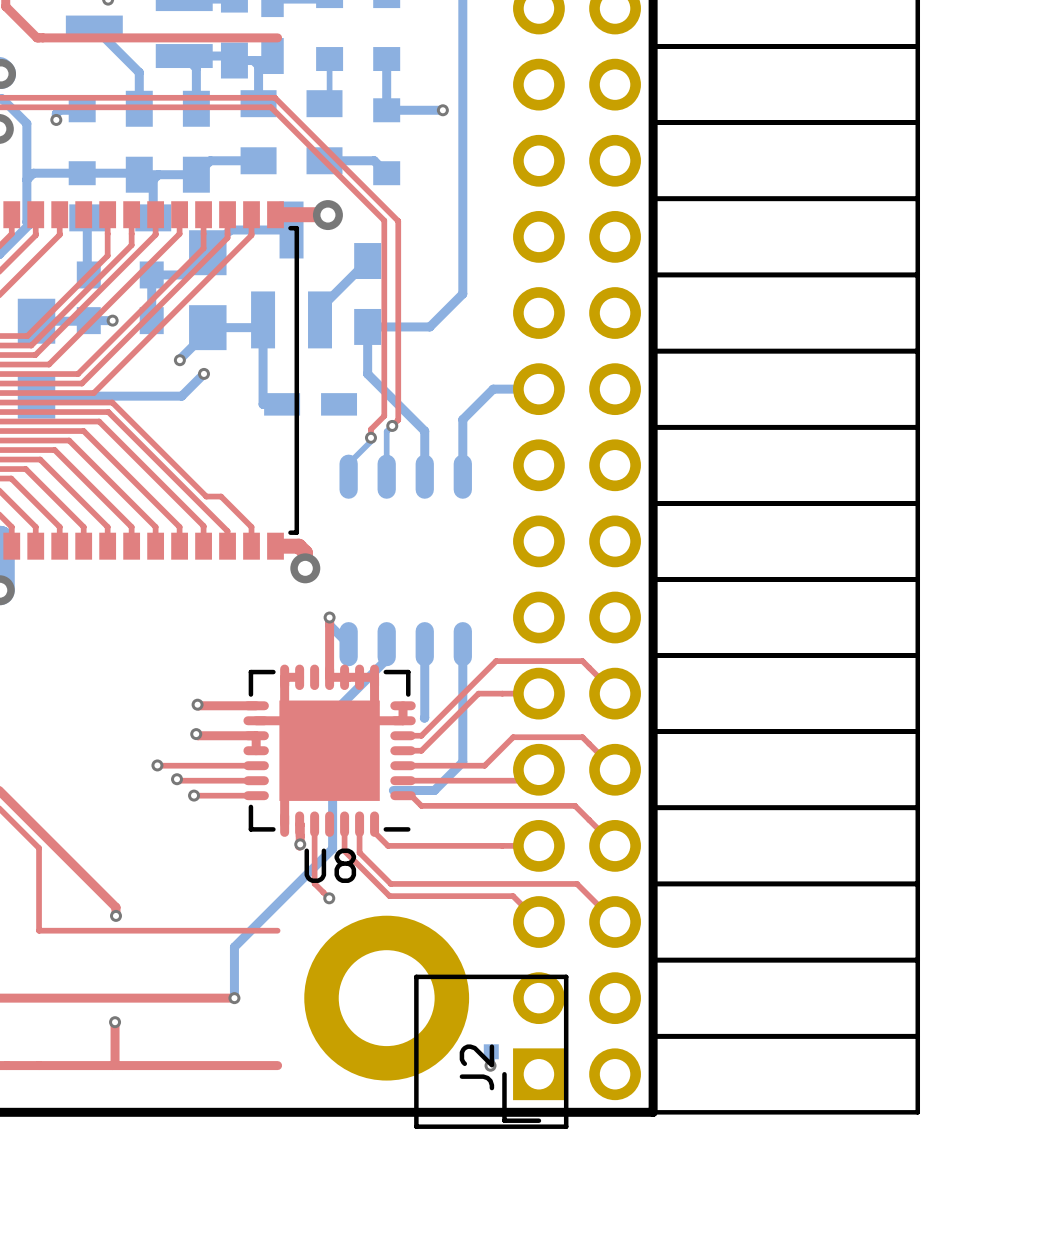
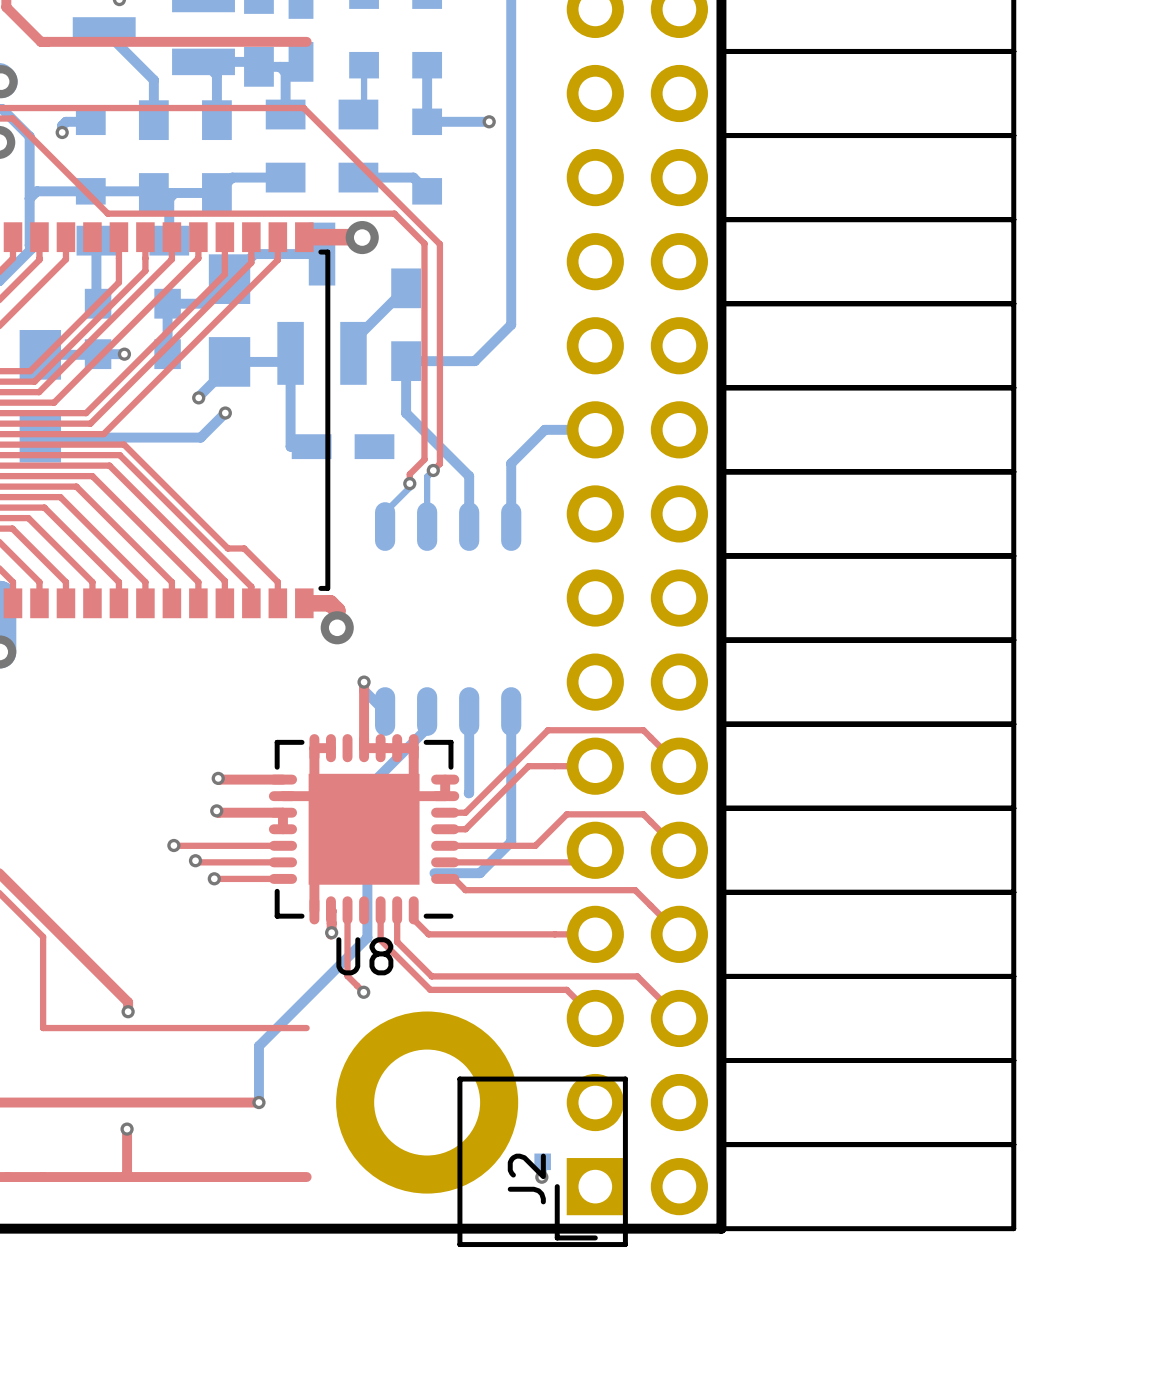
top track: (11, 107) (271, 107) (357, 193) -> (12, 118) (107, 213) (394, 213)

